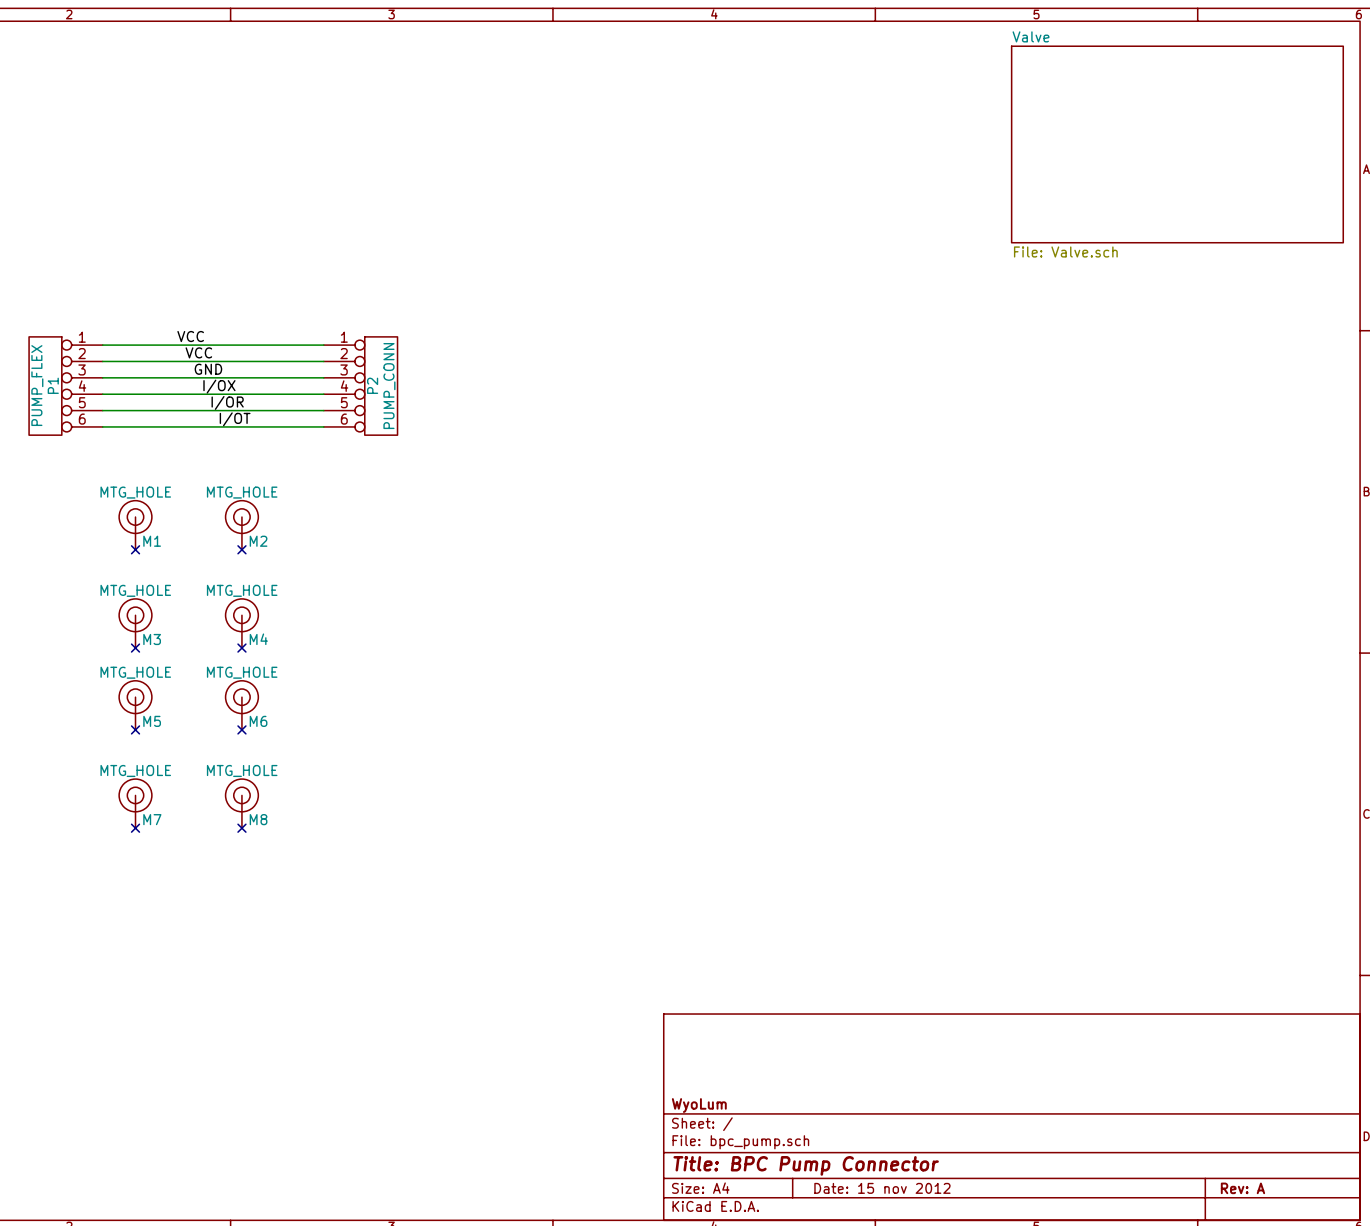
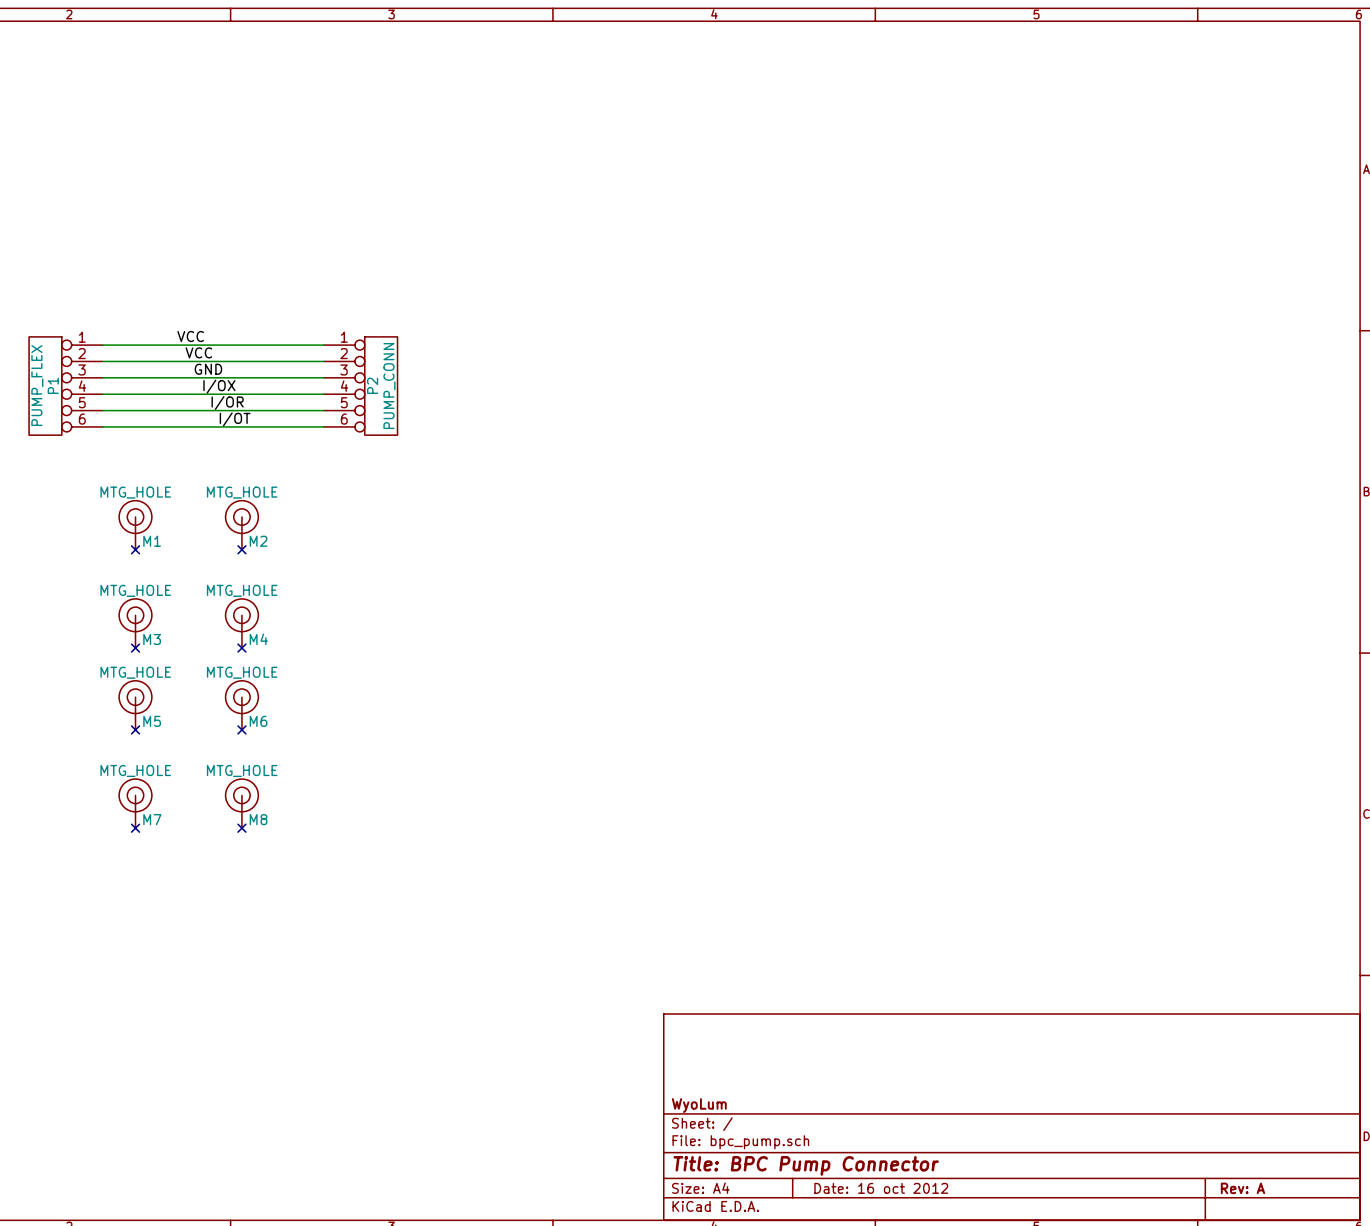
sheet Valve: File: Valve.sch (1177, 144) -> none
title block: Date: 15 nov 2012 (882, 1188) -> Date: 16 oct 2012 (881, 1188)

